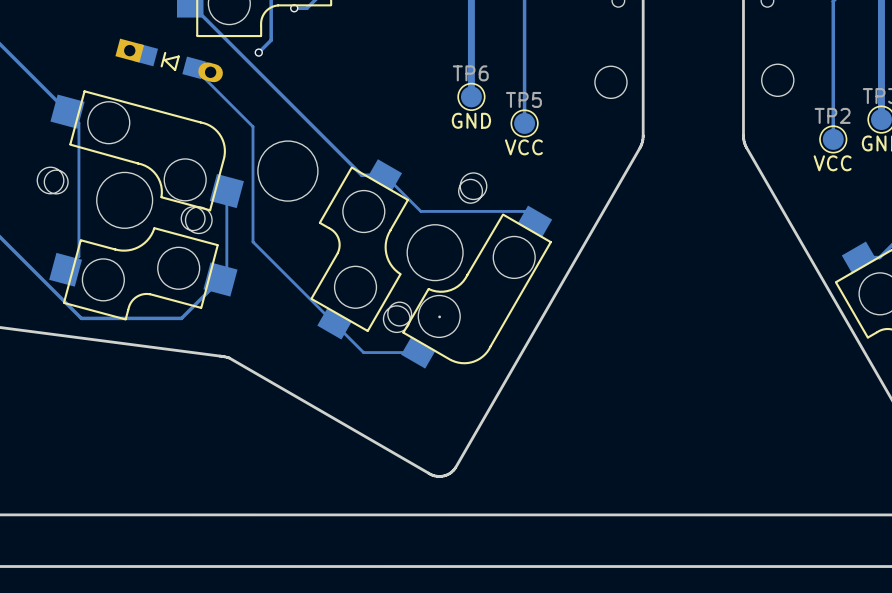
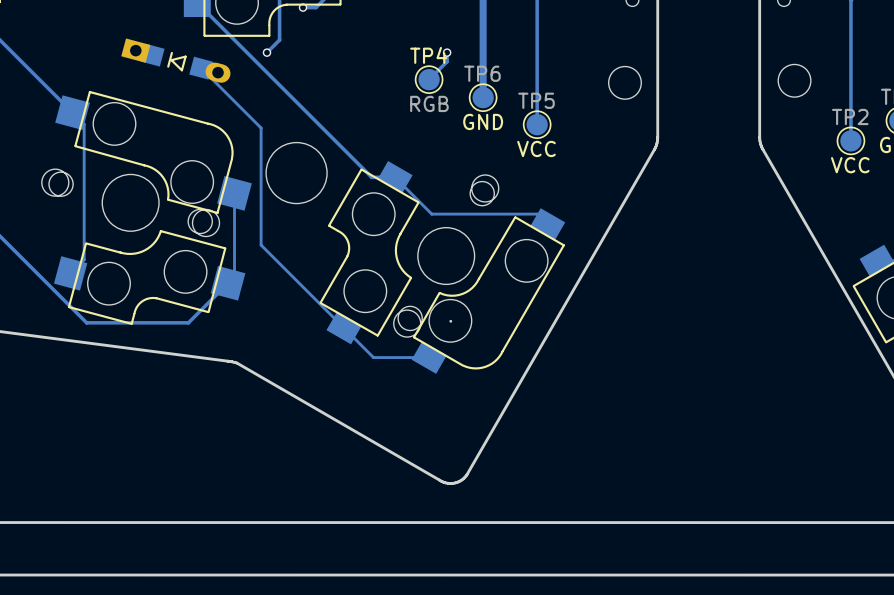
track: none -> (447, 52) (447, 61) (429, 79)
via: none -> (447, 52)
TP4: none -> RGB (429, 79)

